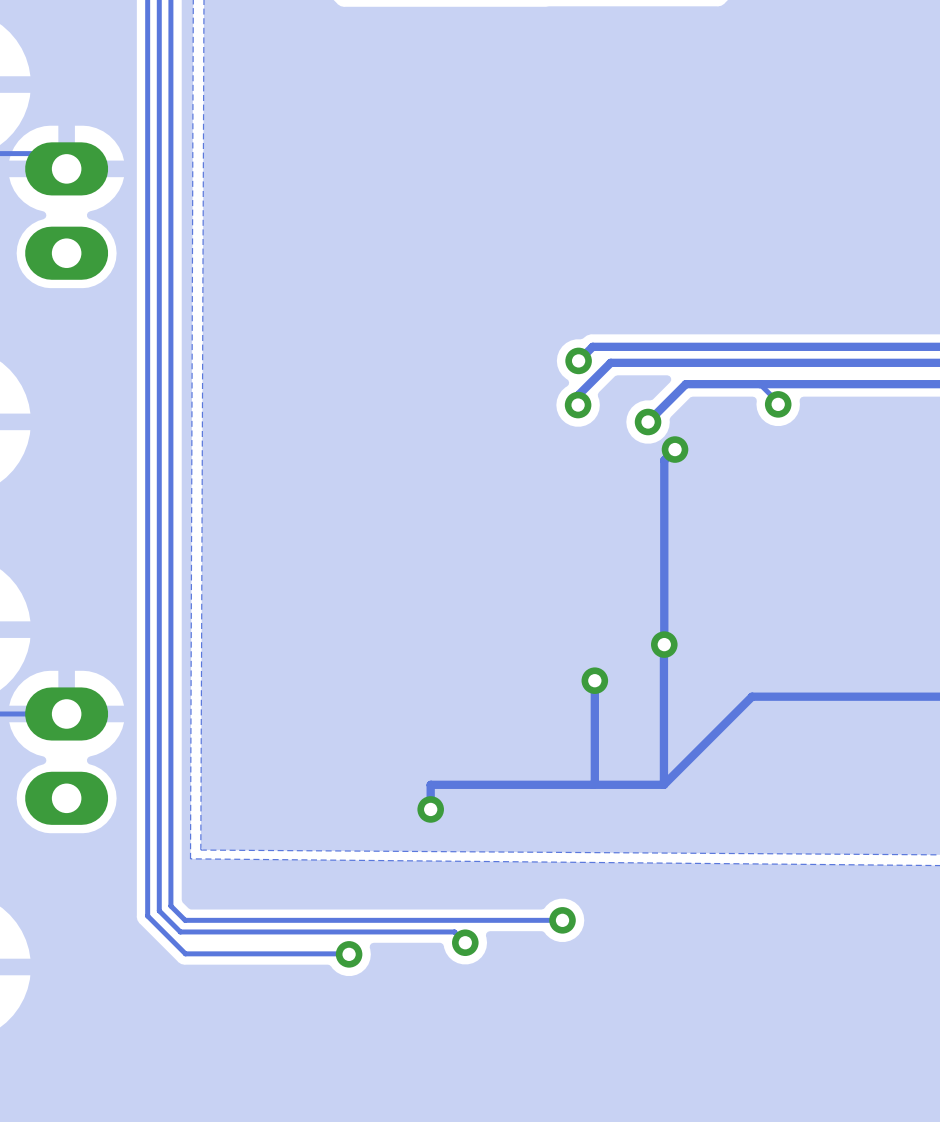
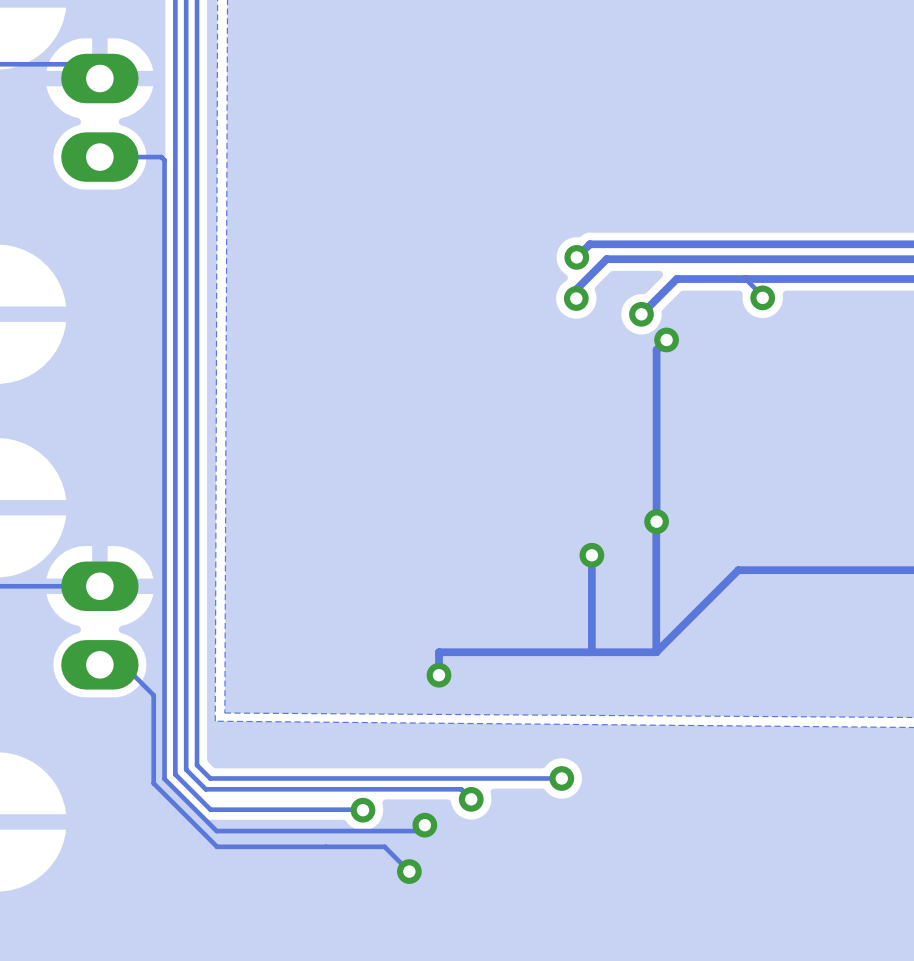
track: none -> (99, 157) (161, 157) (164, 160) (164, 778) (216, 831) (418, 831) (424, 825)
track: none -> (99, 664) (123, 664) (153, 695) (153, 783) (217, 846) (384, 846) (409, 871)
via: none -> (424, 825)
via: none -> (409, 871)

